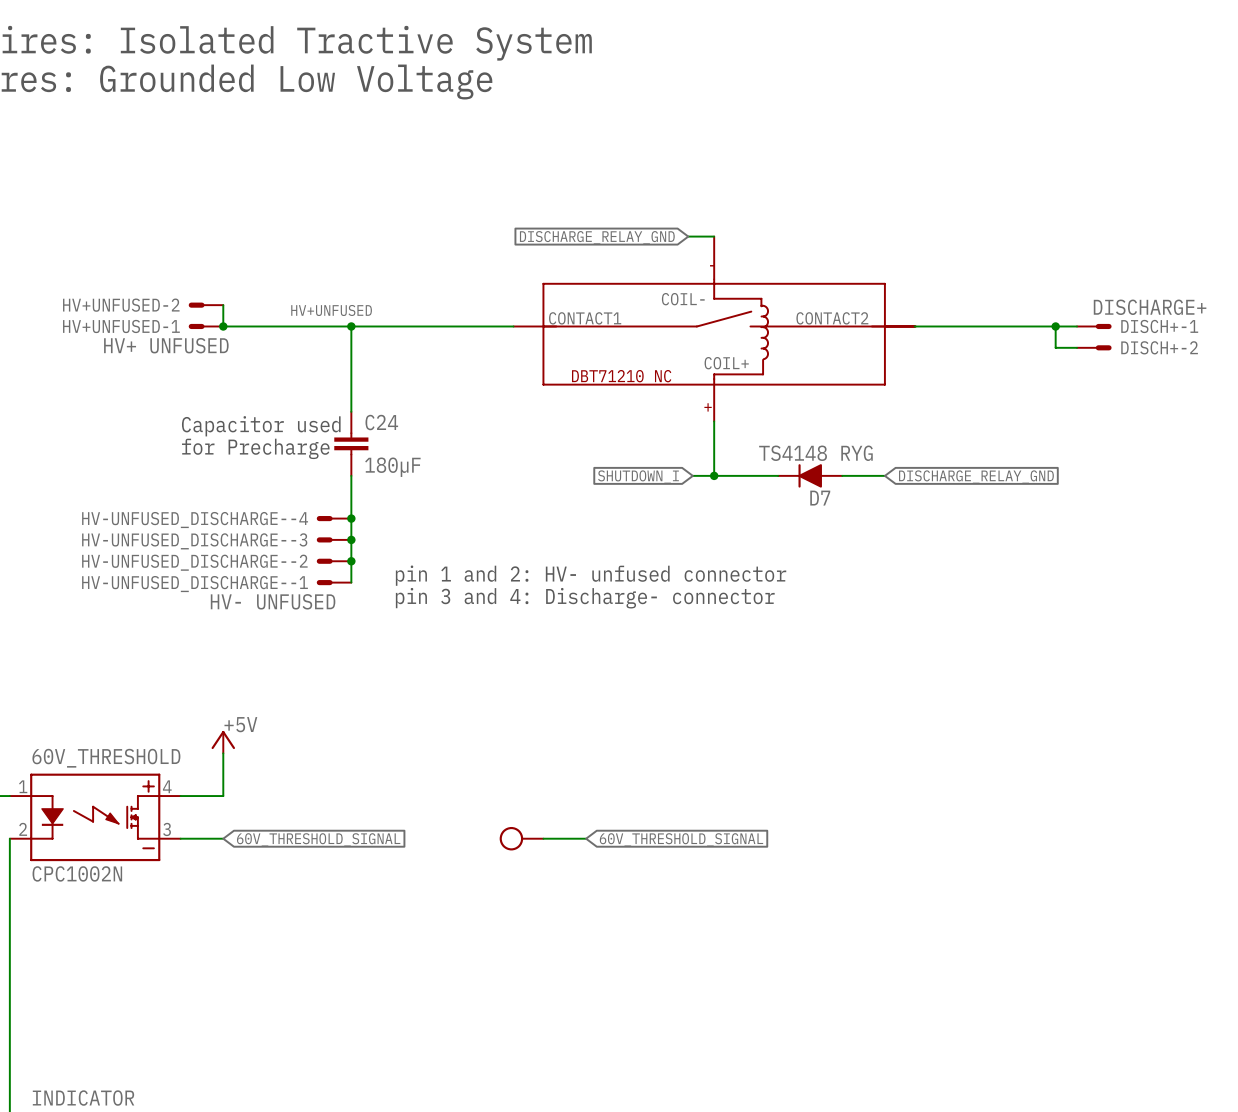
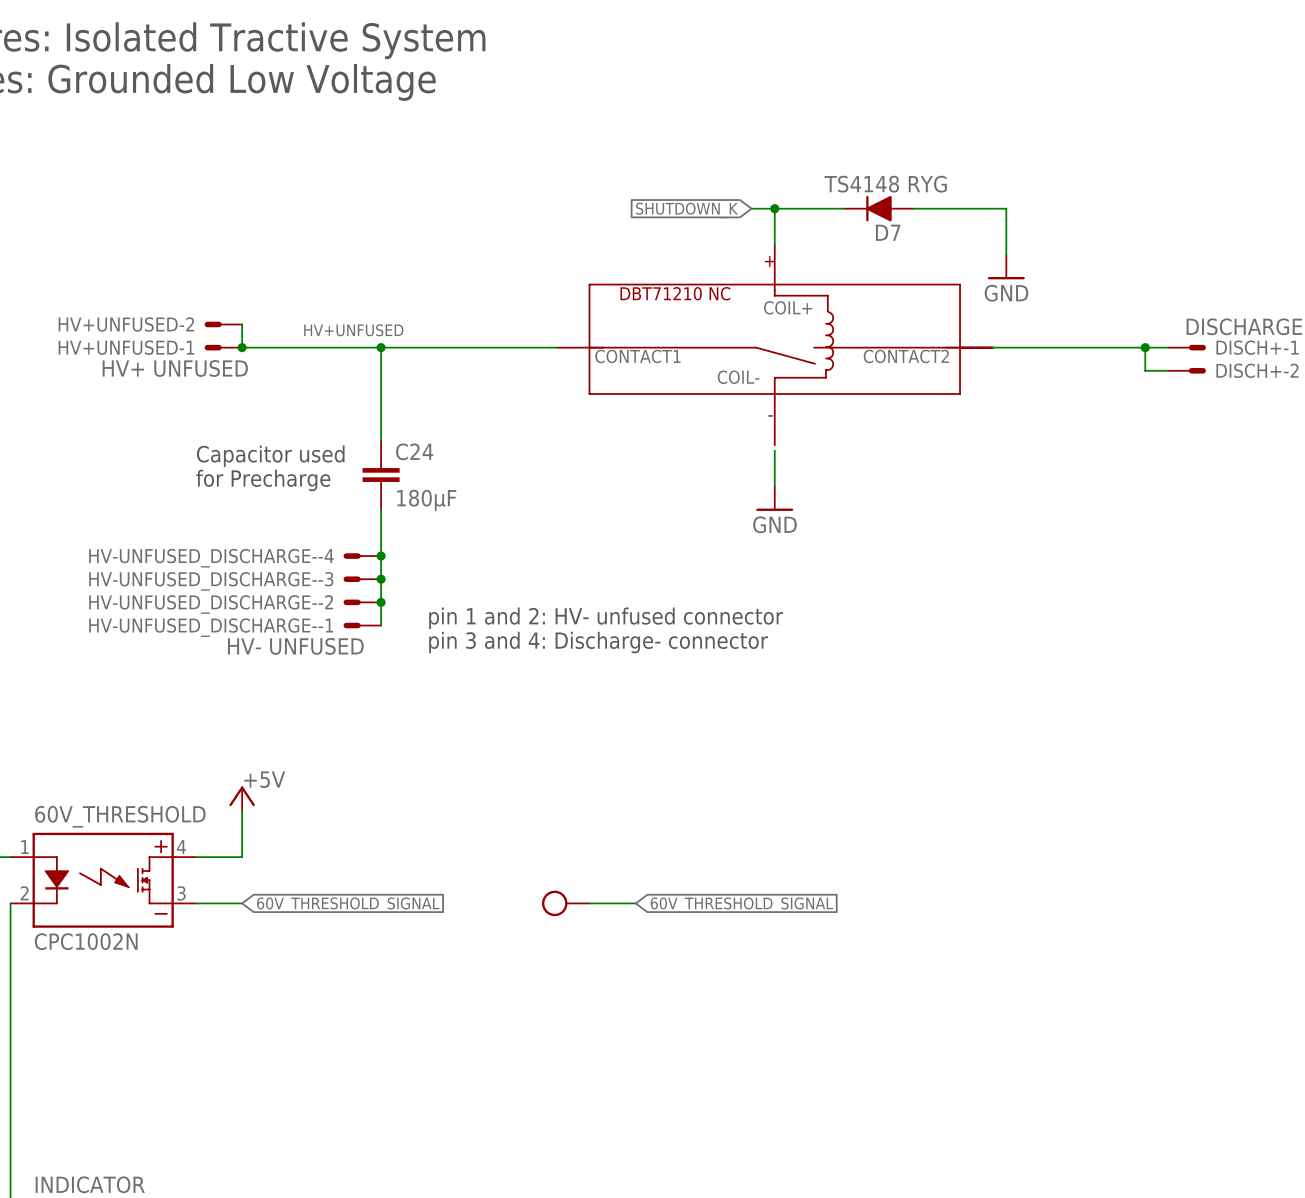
wire: none -> (751, 208) (844, 208)
wire: none -> (774, 208) (774, 244)
junction: none -> (774, 208)
wire: none -> (913, 208) (1006, 208) (1006, 255)
global label: none -> SHUTDOWN_K (687, 210)
part symbol: [513, 236, 917, 422] -> [557, 244, 995, 446]
wire: (688, 236) (714, 236) -> none
global label: DISCHARGE_RELAY_GND (597, 237) -> none
power symbol: none -> GND (1006, 267)
power symbol: none -> GND (774, 498)
wire: (692, 475) (778, 475) -> none
junction: (714, 475) -> none
D7 position: (810, 475) -> (878, 208)
wire: (842, 475) (884, 475) -> none
global label: SHUTDOWN_I (638, 477) -> none
global label: DISCHARGE_RELAY_GND (976, 477) -> none

